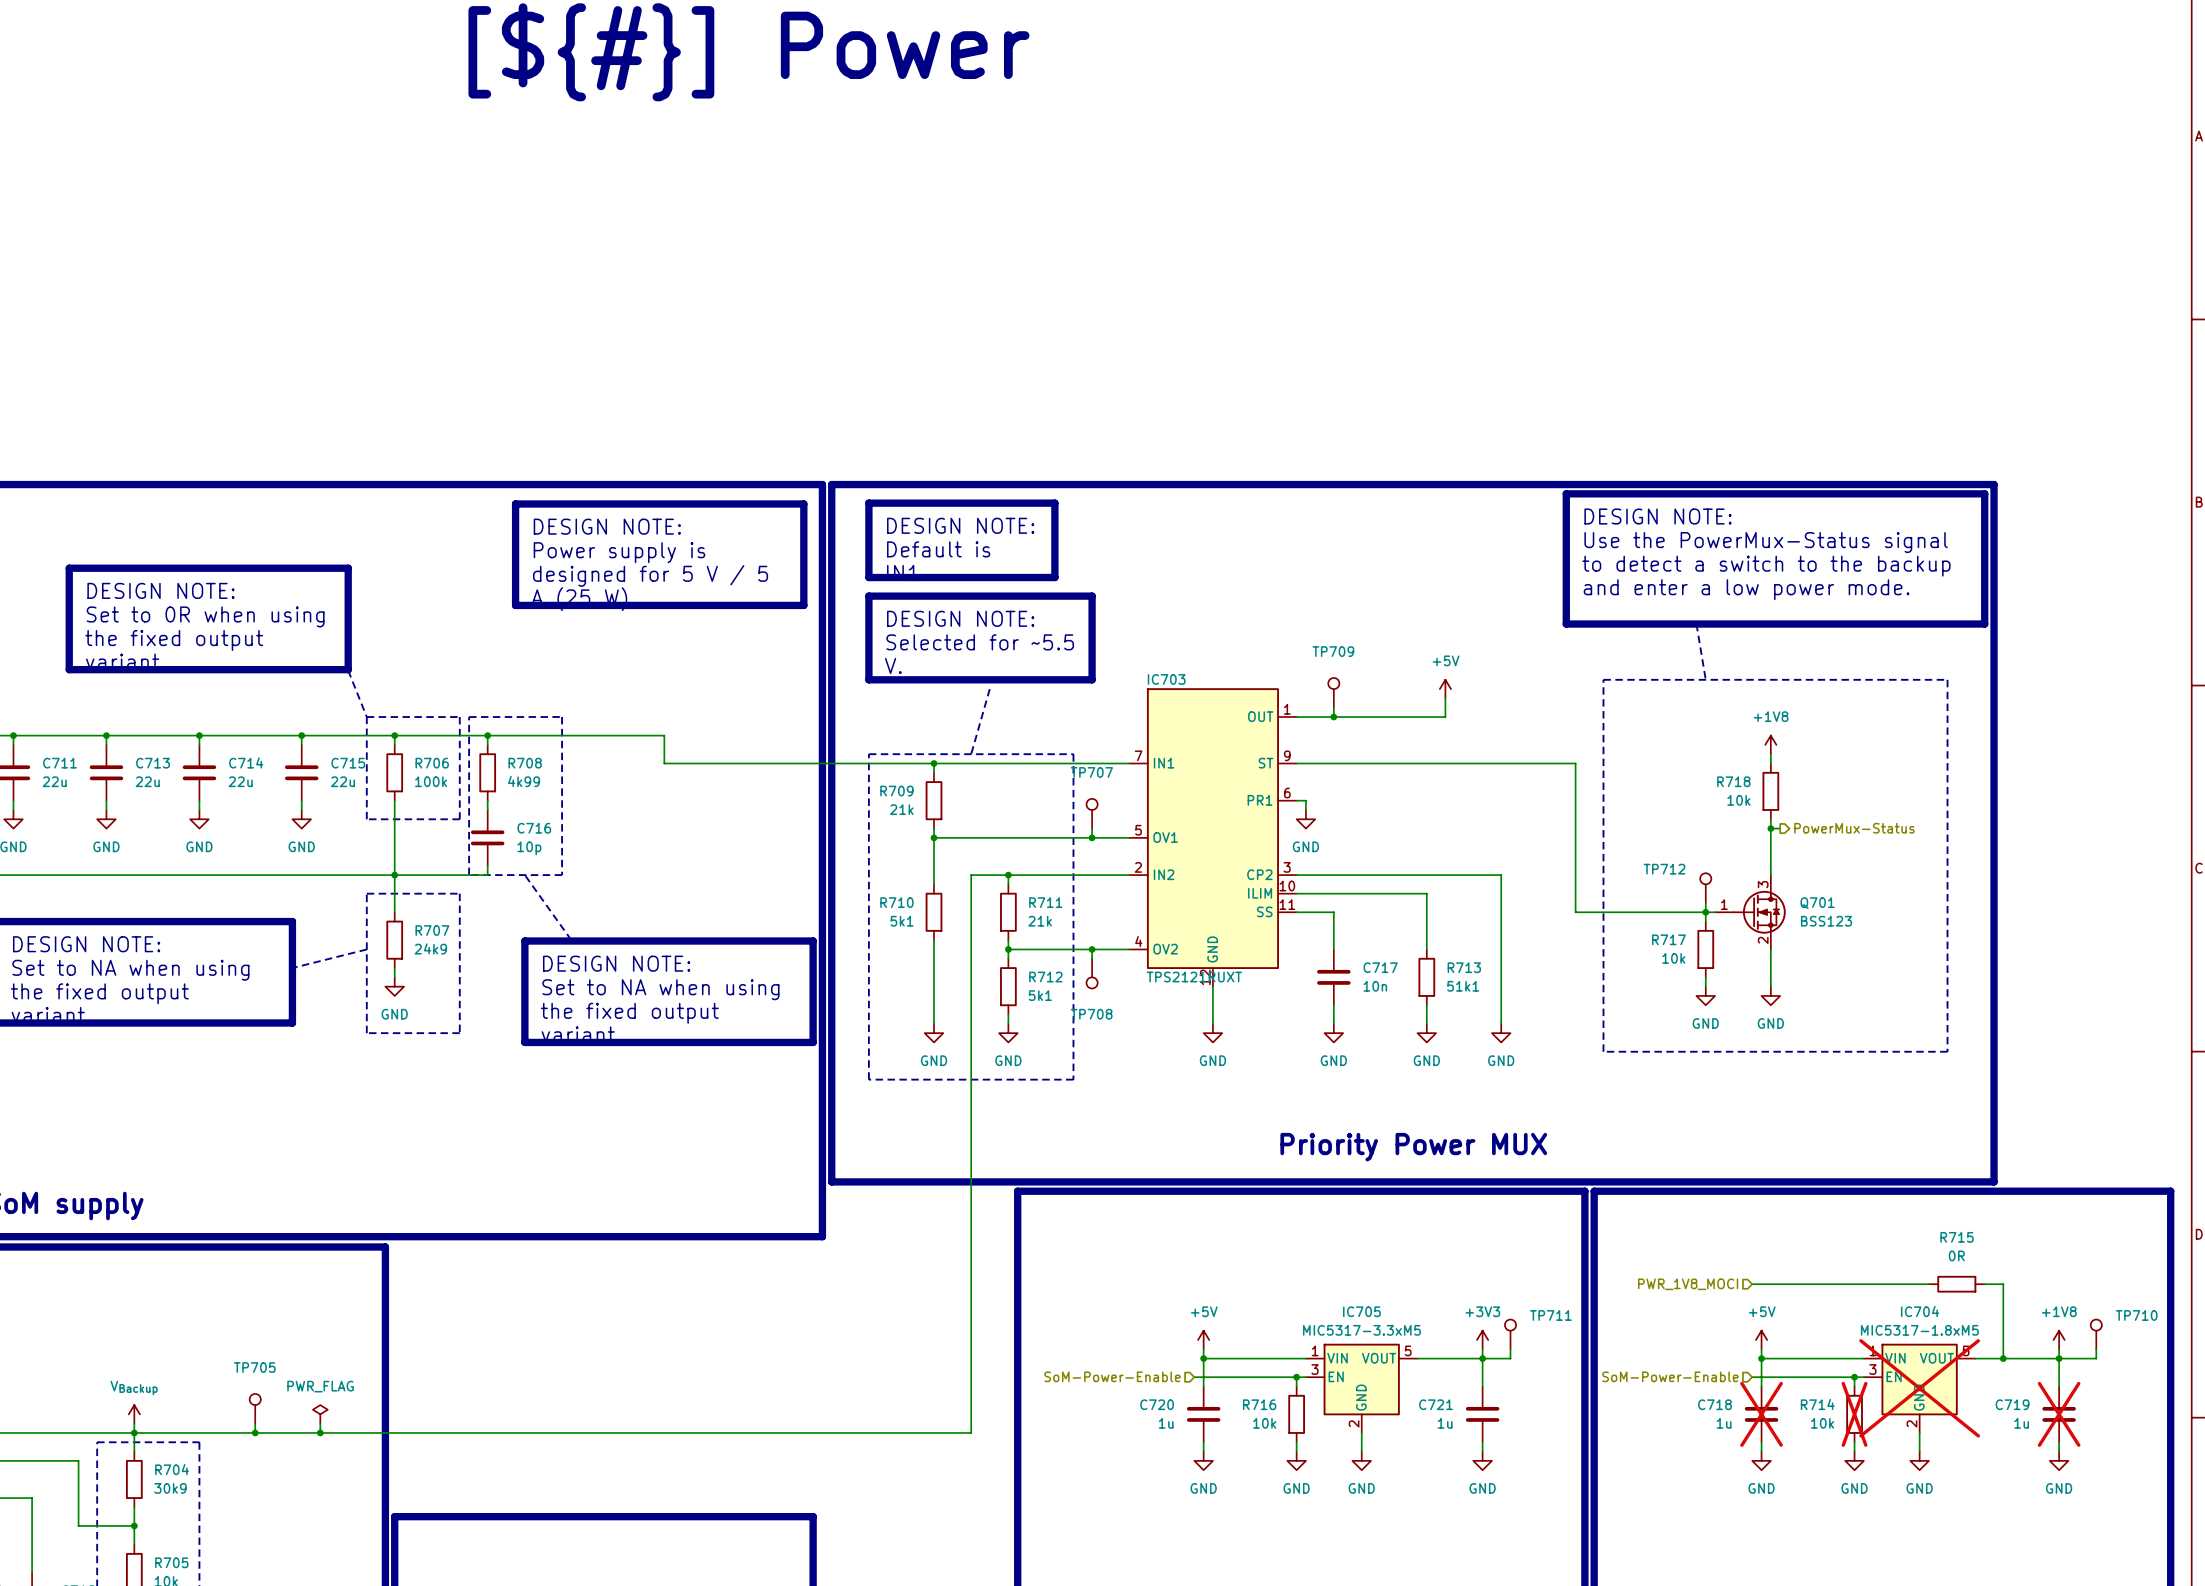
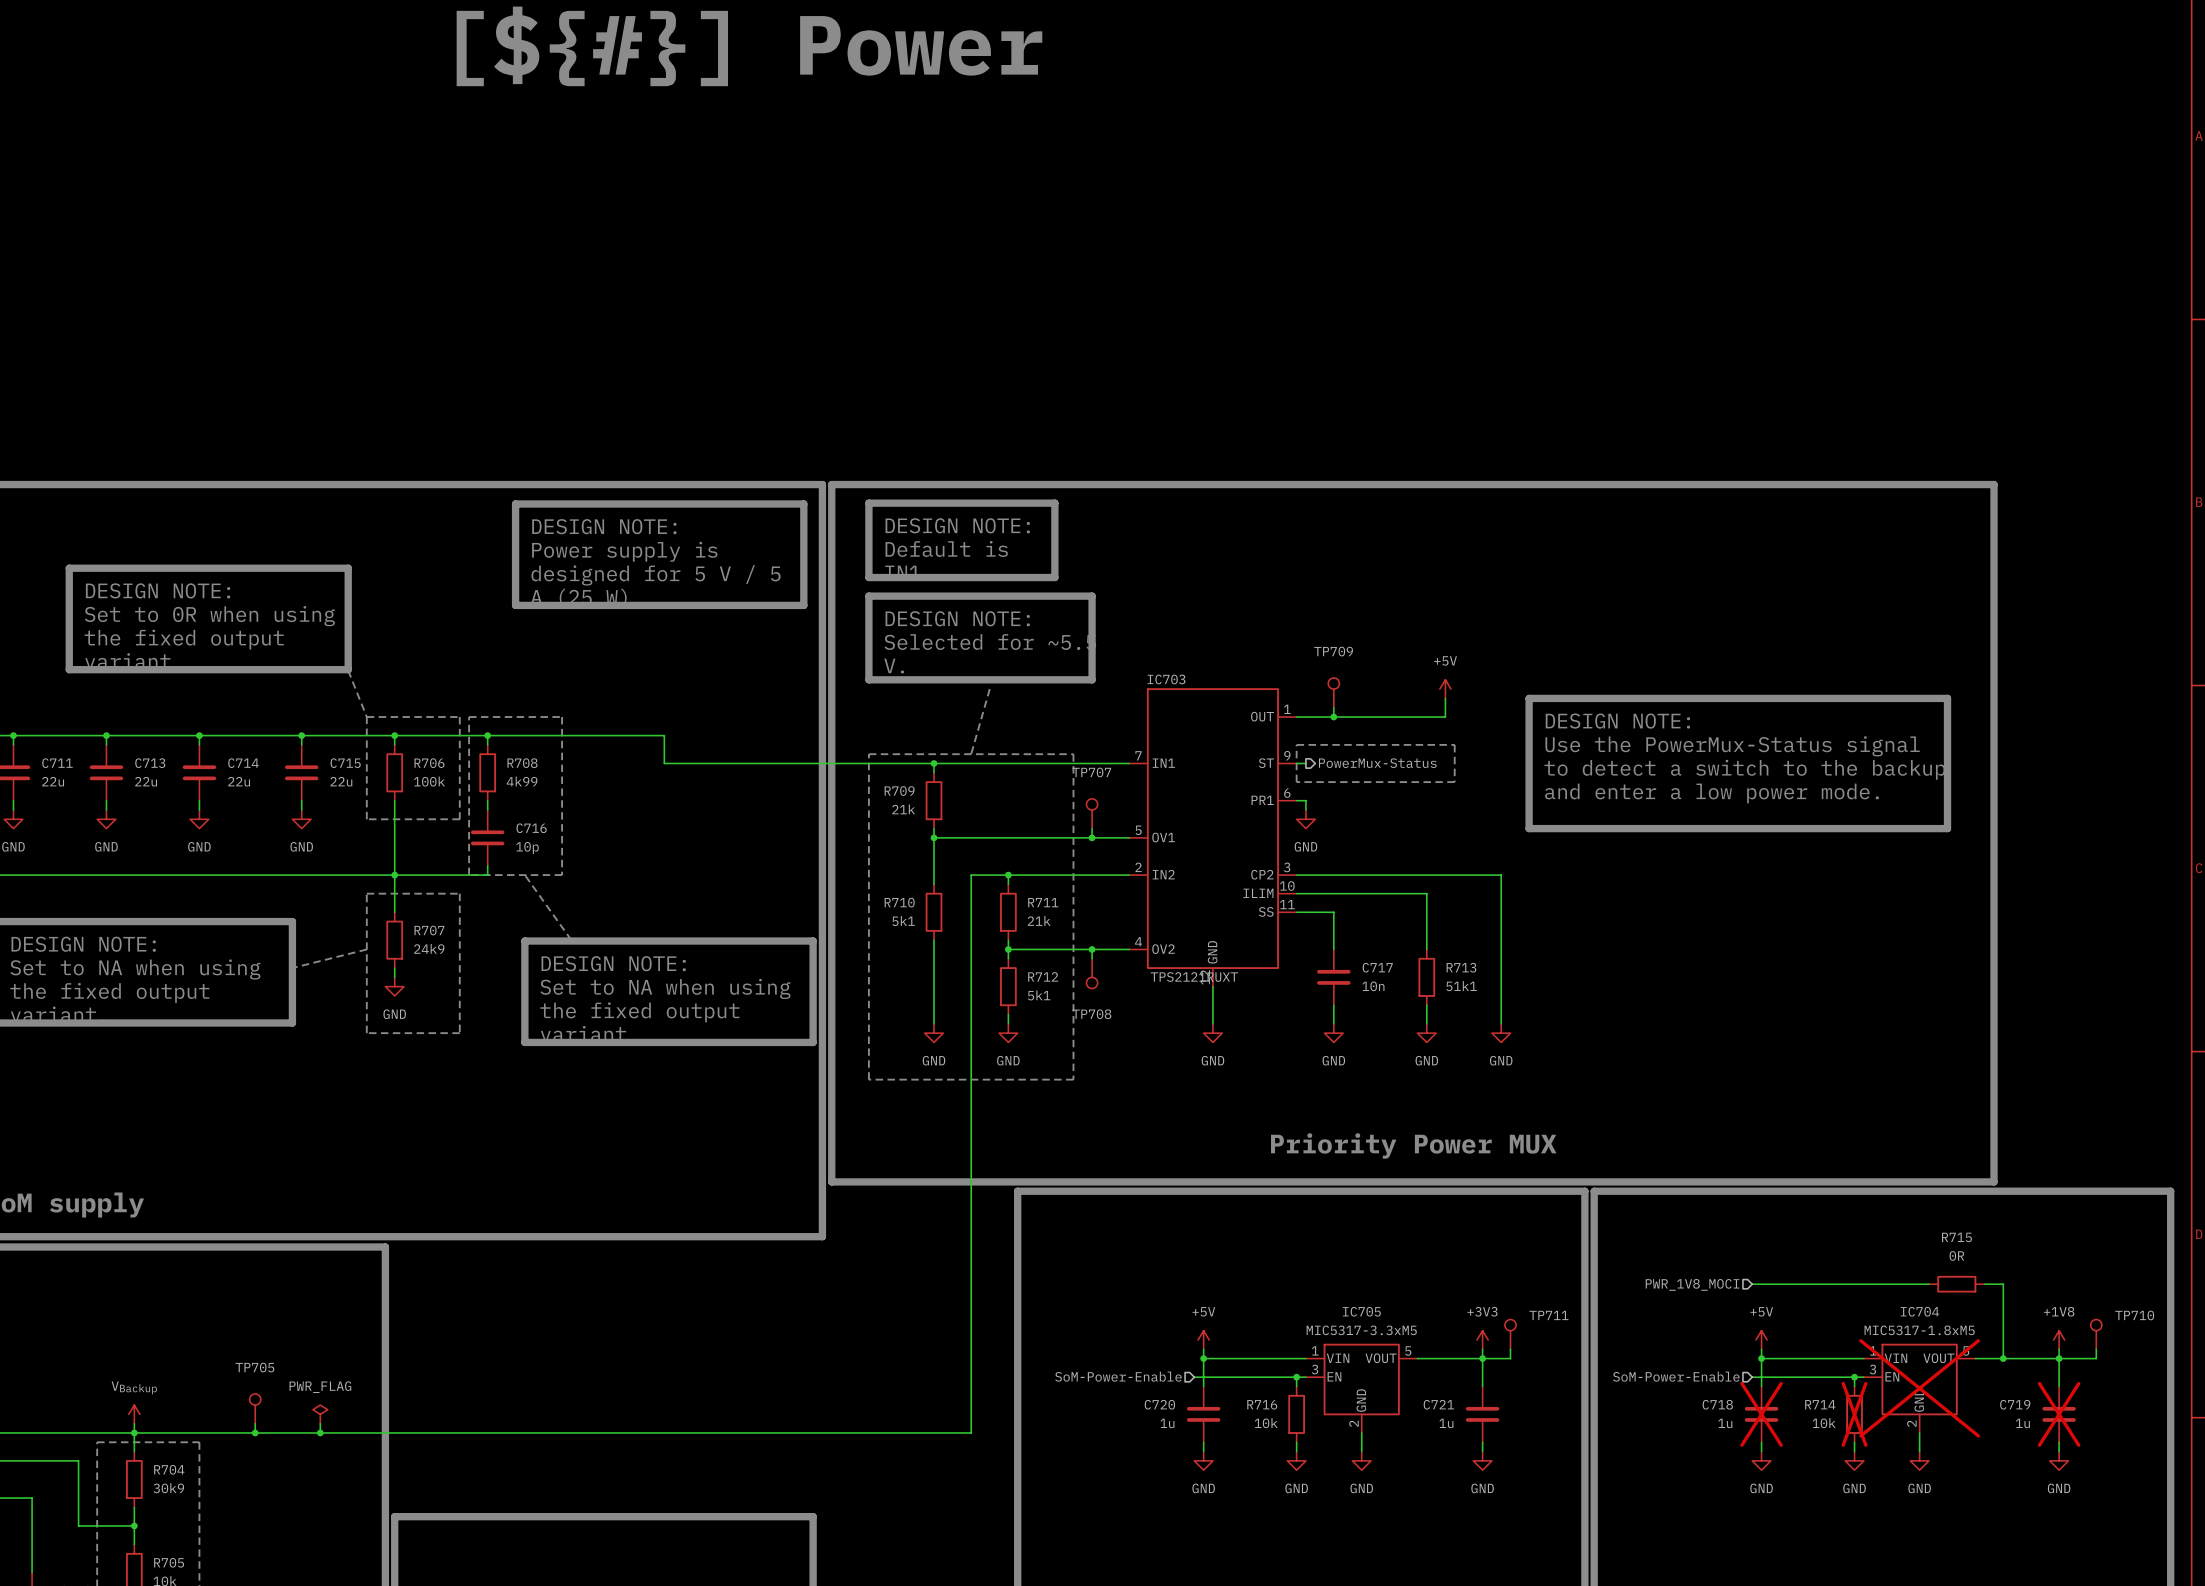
line: (1566, 493) (1984, 493) (1984, 624) (1566, 624) (1566, 493) -> none
text: DESIGN NOTE: (1658, 516) -> none
text: Use the PowerMux-Status signal (1766, 542) -> none
text: to detect a switch to the backup (1766, 566) -> none
text: and enter a low power mode. (1746, 589) -> none
line: (1696, 624) (1705, 679) -> none
line: (1603, 679) (1947, 679) (1947, 1051) (1603, 1051) (1603, 679) -> none
line: none -> (1529, 698) (1947, 698) (1947, 828) (1529, 828) (1529, 698)
text: none -> DESIGN NOTE: (1617, 721)
line: none -> (1296, 744) (1454, 744) (1454, 782) (1296, 782) (1296, 744)
power symbol: +1V8 (1770, 744) -> none
text: none -> Use the PowerMux-Status signal (1732, 746)
wire: (1770, 754) (1770, 763) -> none
wire: (1305, 763) (1575, 763) (1575, 912) (1715, 912) -> none
hierarchical label: none -> PowerMux-Status (1377, 763)
text: none -> to detect a switch to the backup (1744, 769)
R718: 10k (1770, 791) -> none
text: none -> and enter a low power mode. (1711, 793)
wire: (1770, 819) (1770, 875) -> none
junction: (1770, 828) -> none
hierarchical label: PowerMux-Status (1854, 828) -> none
TP712: (1705, 888) -> none
wire: (1705, 902) (1705, 921) -> none
junction: (1705, 912) -> none
Q701: BSS123 (1750, 912) -> none
R717: 10k (1705, 949) -> none
wire: (1770, 949) (1770, 986) -> none
wire: (1705, 977) (1705, 986) -> none
power symbol: GND (1705, 995) -> none
power symbol: GND (1770, 995) -> none

